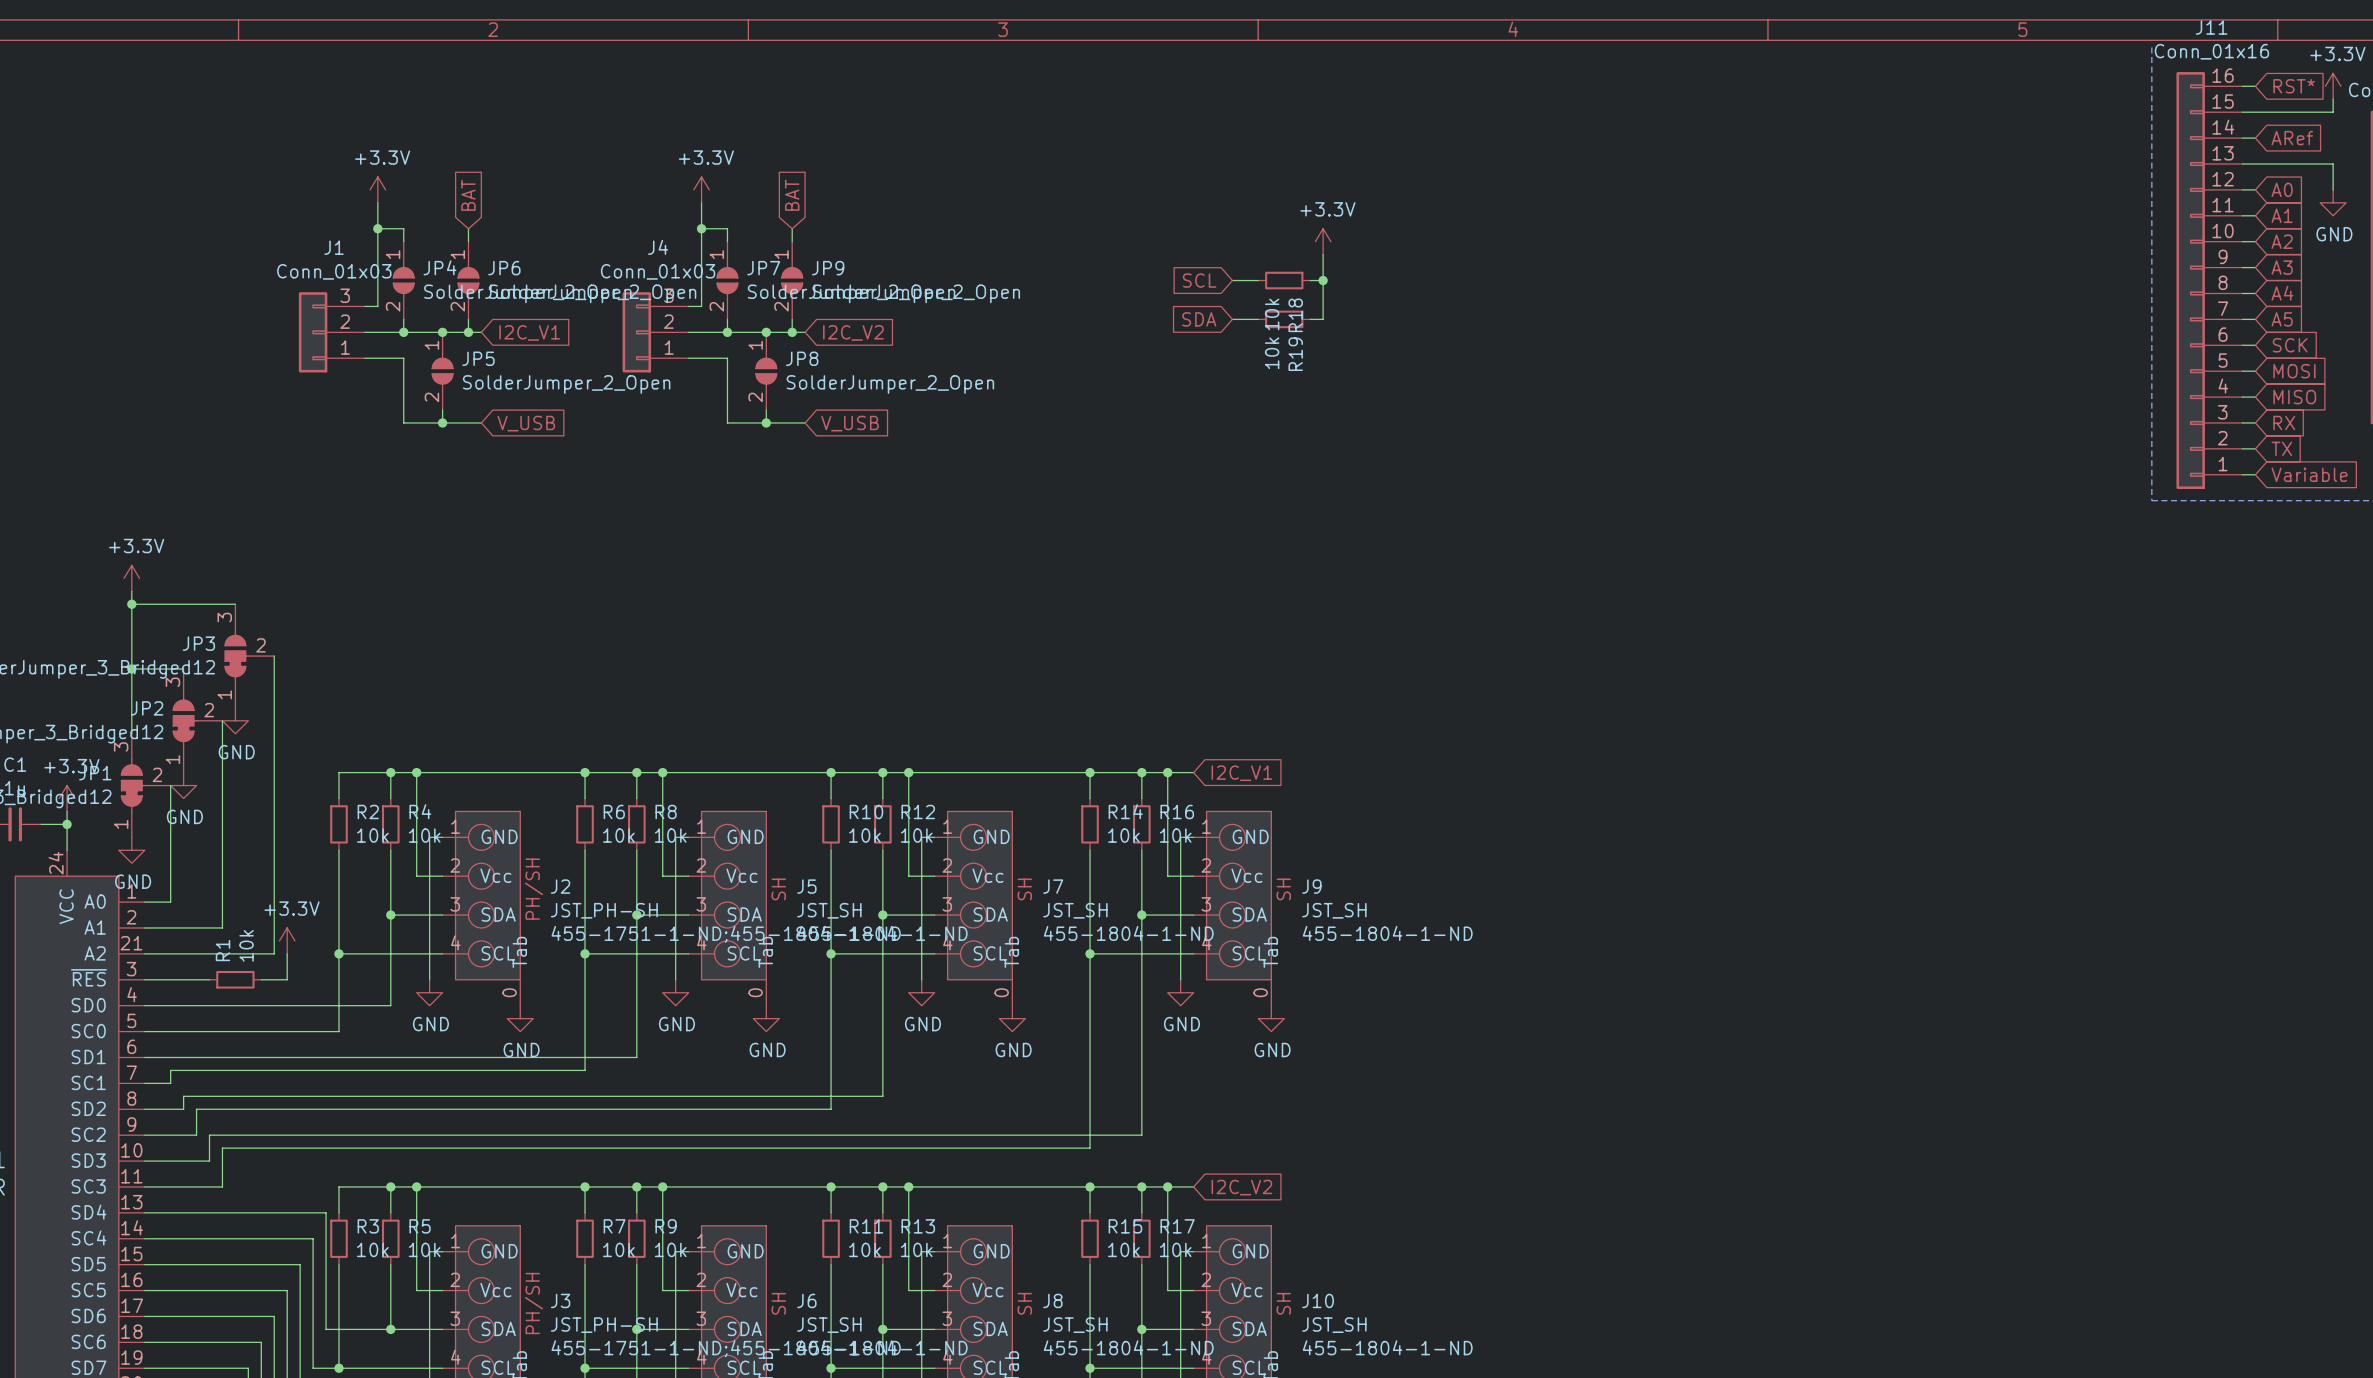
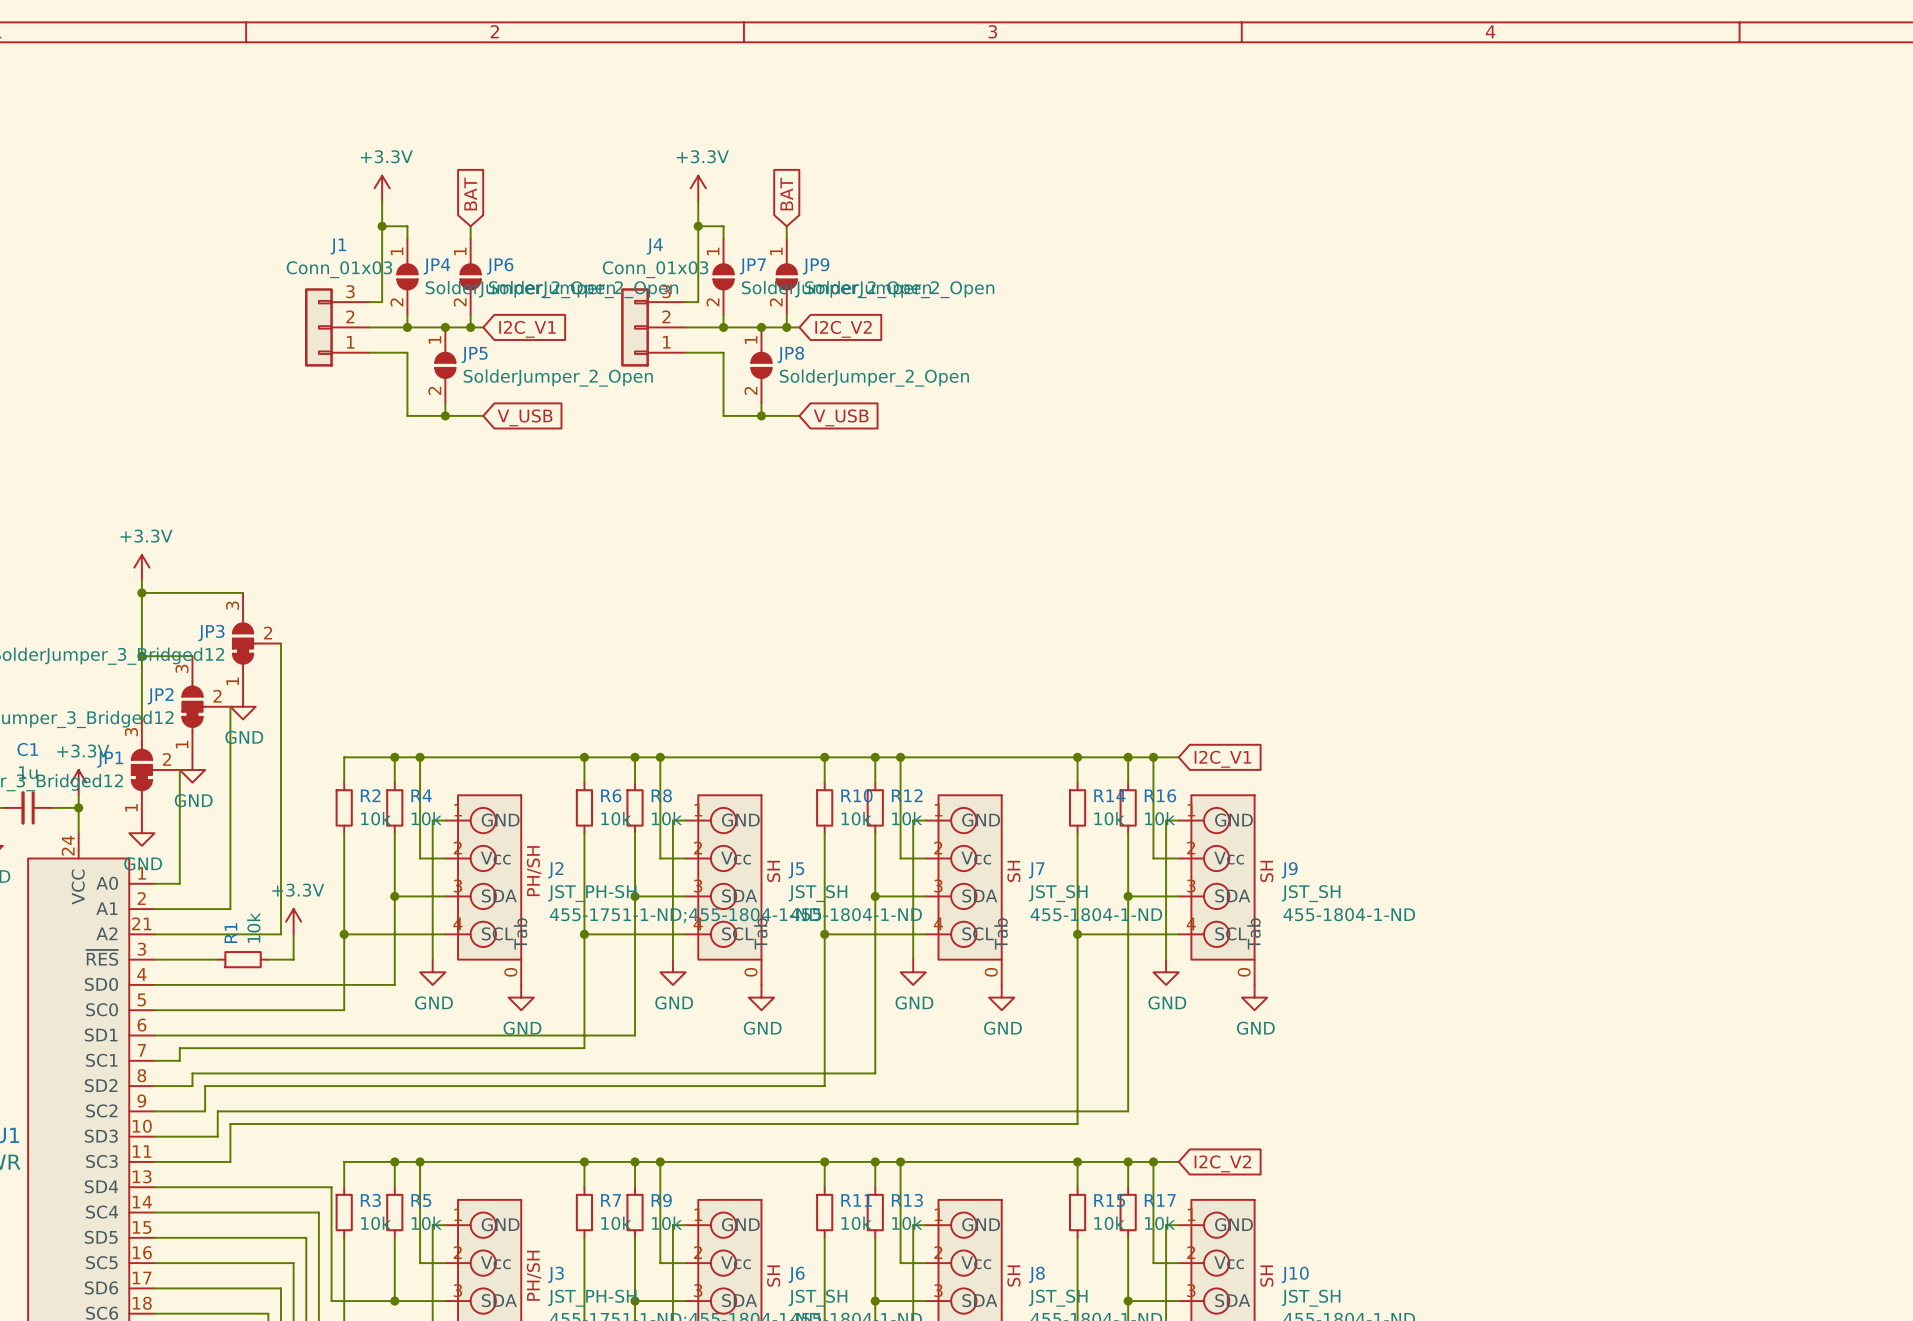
power symbol: +3.3V (1323, 241) -> none
wire: (1323, 254) (1323, 319) (1310, 319) -> none
global label: SCL (1199, 280) -> none
wire: (1232, 280) (1258, 280) -> none
R18: 10k (1284, 280) -> none
wire: (1310, 280) (1323, 280) -> none
junction: (1323, 280) -> none
global label: SDA (1199, 319) -> none
wire: (1232, 319) (1258, 319) -> none
R19: 10k (1284, 319) -> none

